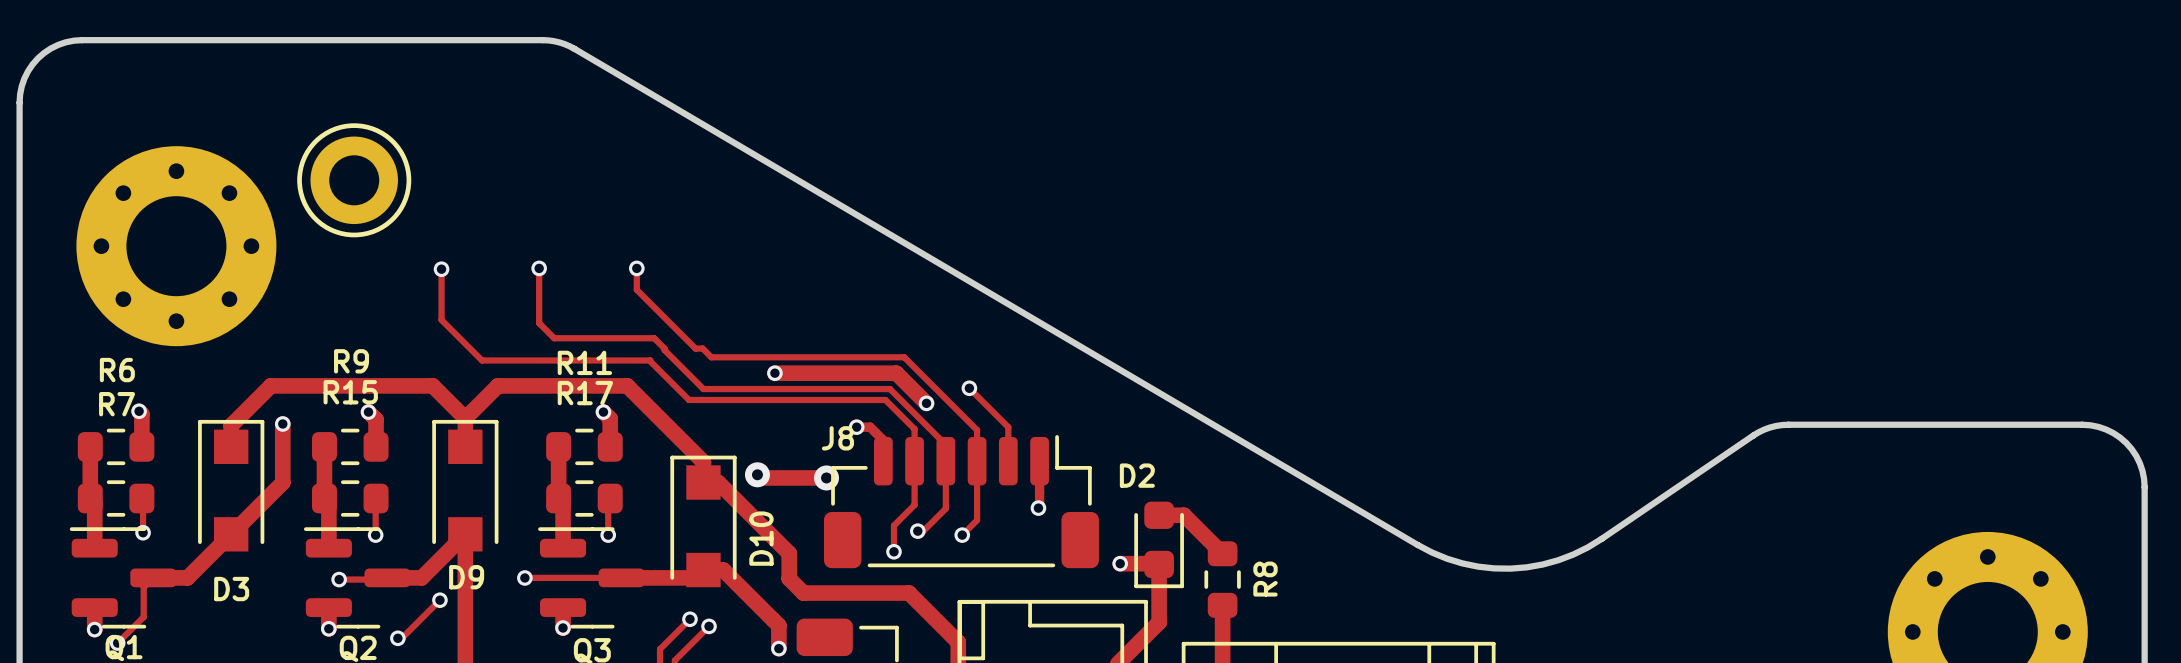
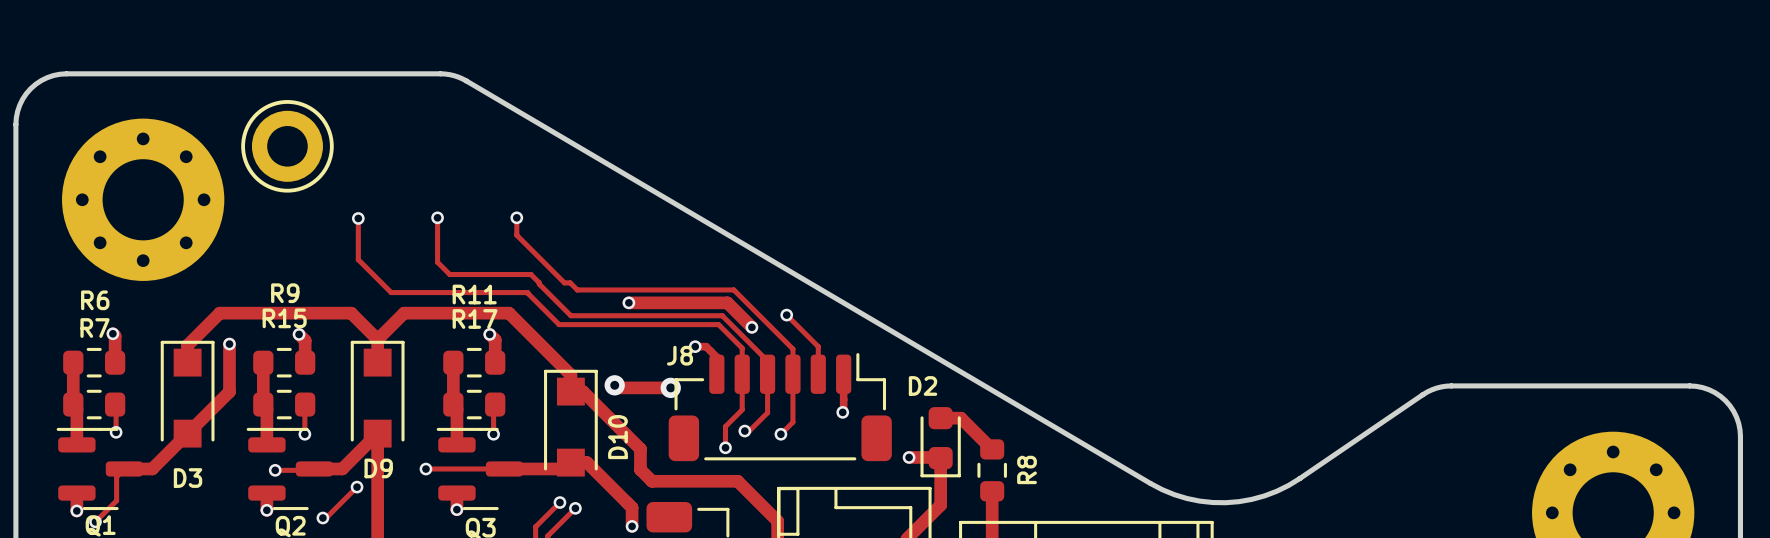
board edge: (19, 153) (19, 102) (24, 78) (32, 64) (44, 53) (65, 42) (82, 40) (553, 41) (574, 48) (1417, 545) (1447, 558) (1478, 566) (1510, 568) (1542, 564) (1573, 554) (1601, 538) (1758, 432) (1770, 427) (1788, 424) (2082, 424) (2098, 426) (2113, 433) (2126, 443) (2139, 463) (2144, 487) (2144, 538) -> (15, 124) (19, 105) (26, 93) (41, 80) (60, 74) (440, 73) (453, 75) (466, 80) (1150, 483) (1174, 494) (1199, 501) (1239, 501) (1276, 491) (1299, 478) (1422, 394) (1431, 389) (1446, 386) (1696, 386) (1715, 392) (1725, 400) (1736, 417) (1740, 436)

